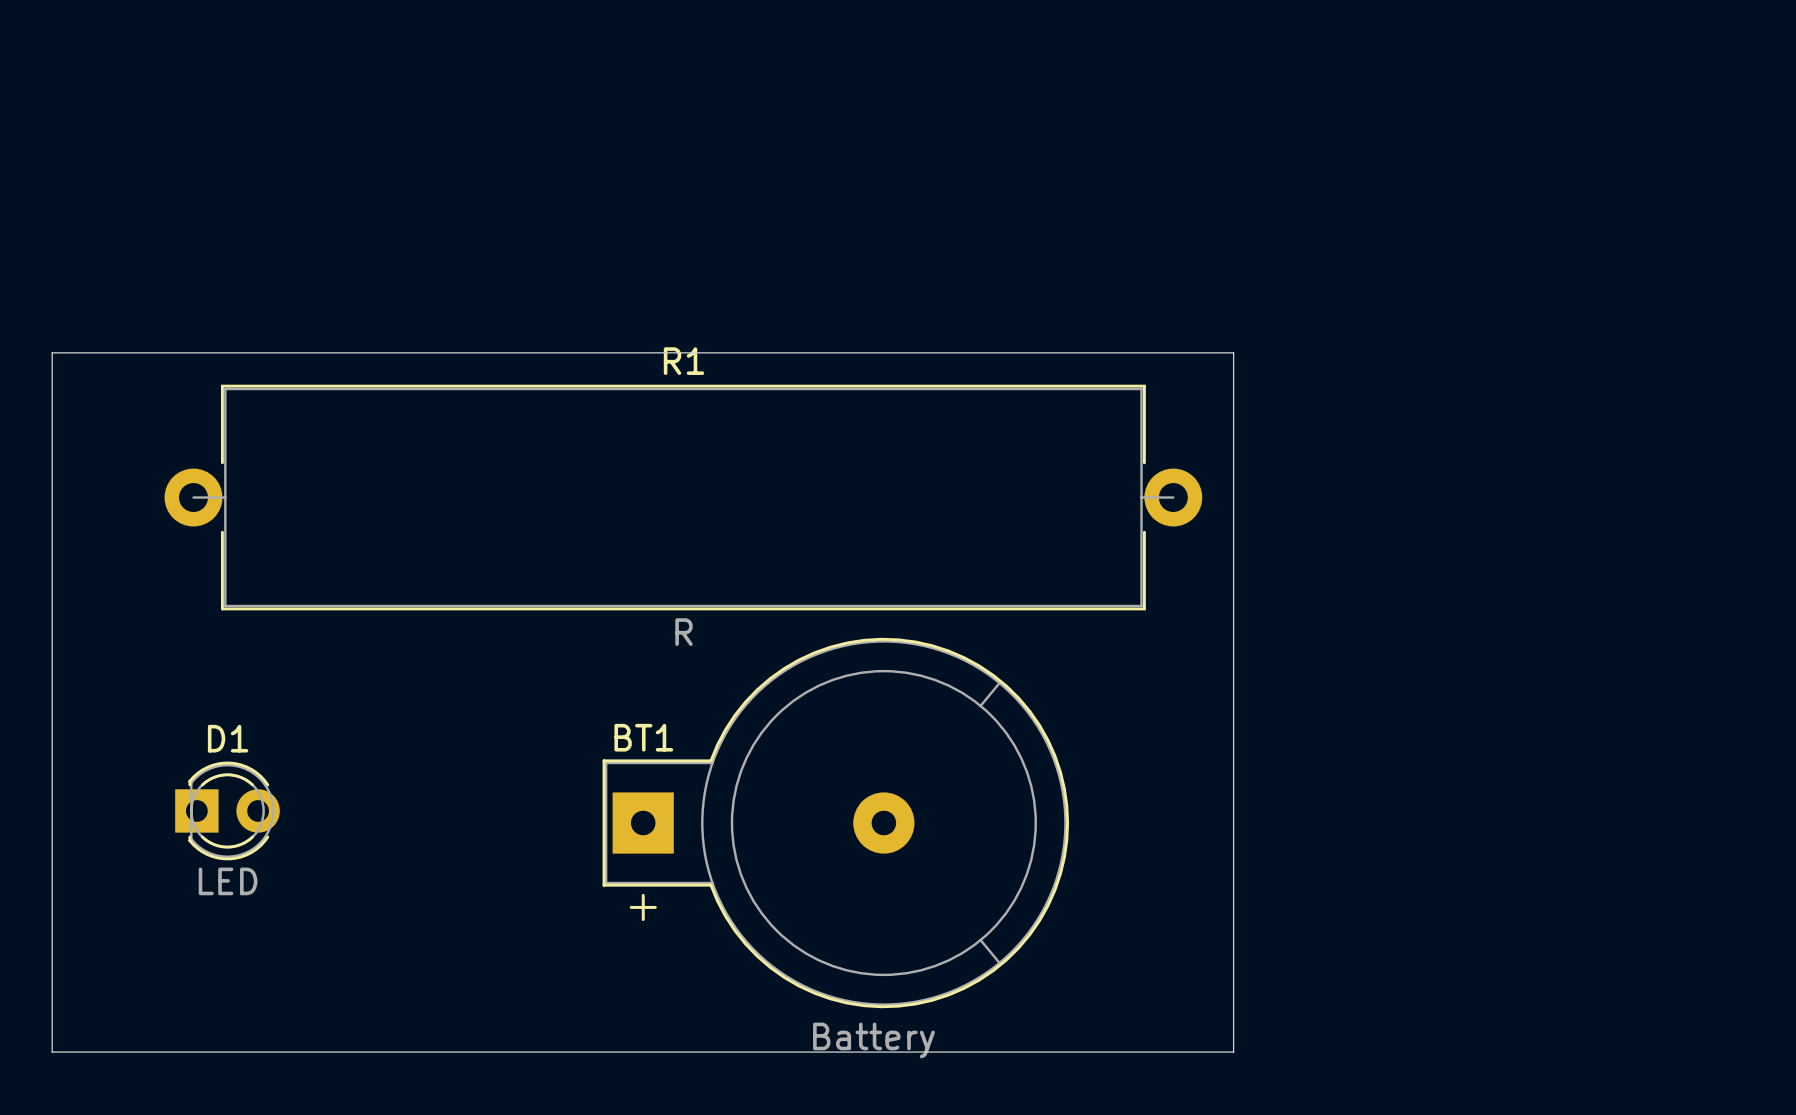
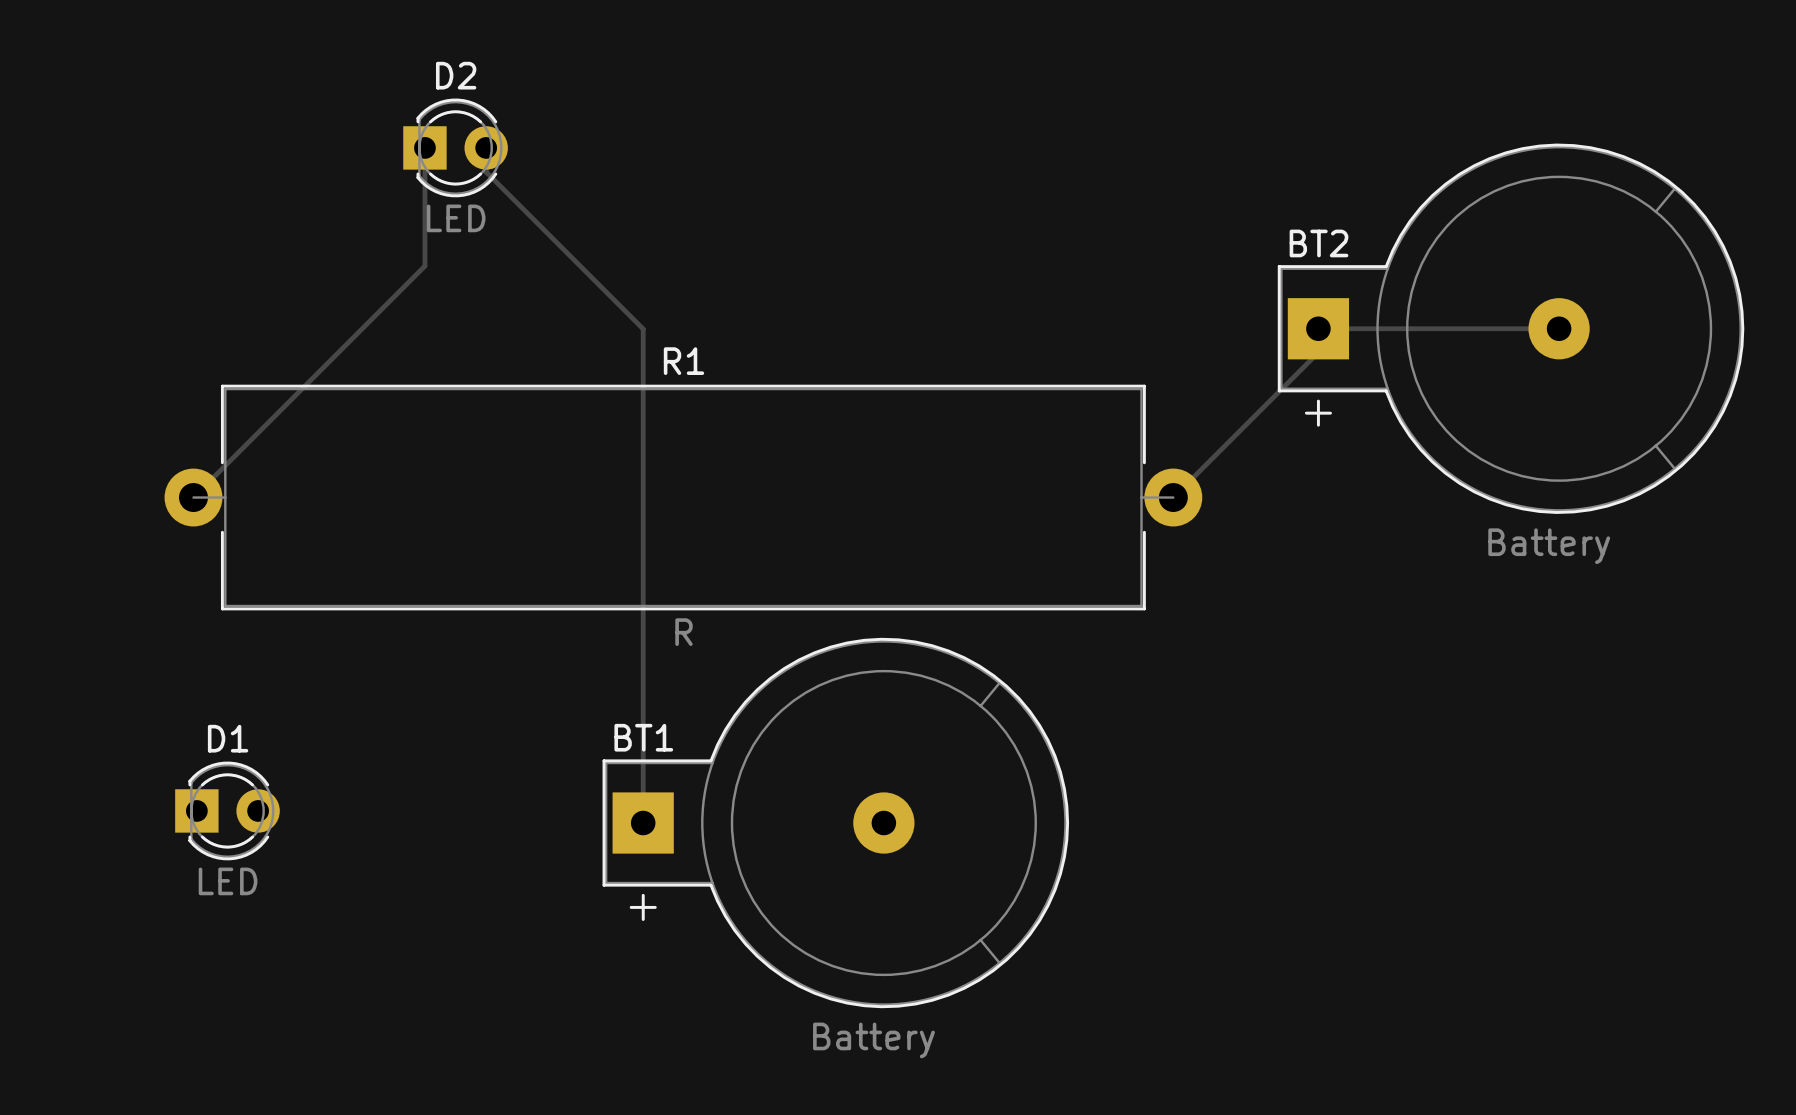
track: none -> (424, 147) (424, 266) (193, 497)
D2: none -> LED (455, 147)
track: none -> (486, 147) (486, 172) (643, 329) (643, 823)
BT2: none -> Battery (1511, 328)
track: none -> (1559, 328) (1318, 328) (1318, 352) (1173, 497)
board edge: (52, 352) (1233, 352) (1233, 1052) (52, 1052) (52, 352) -> none

